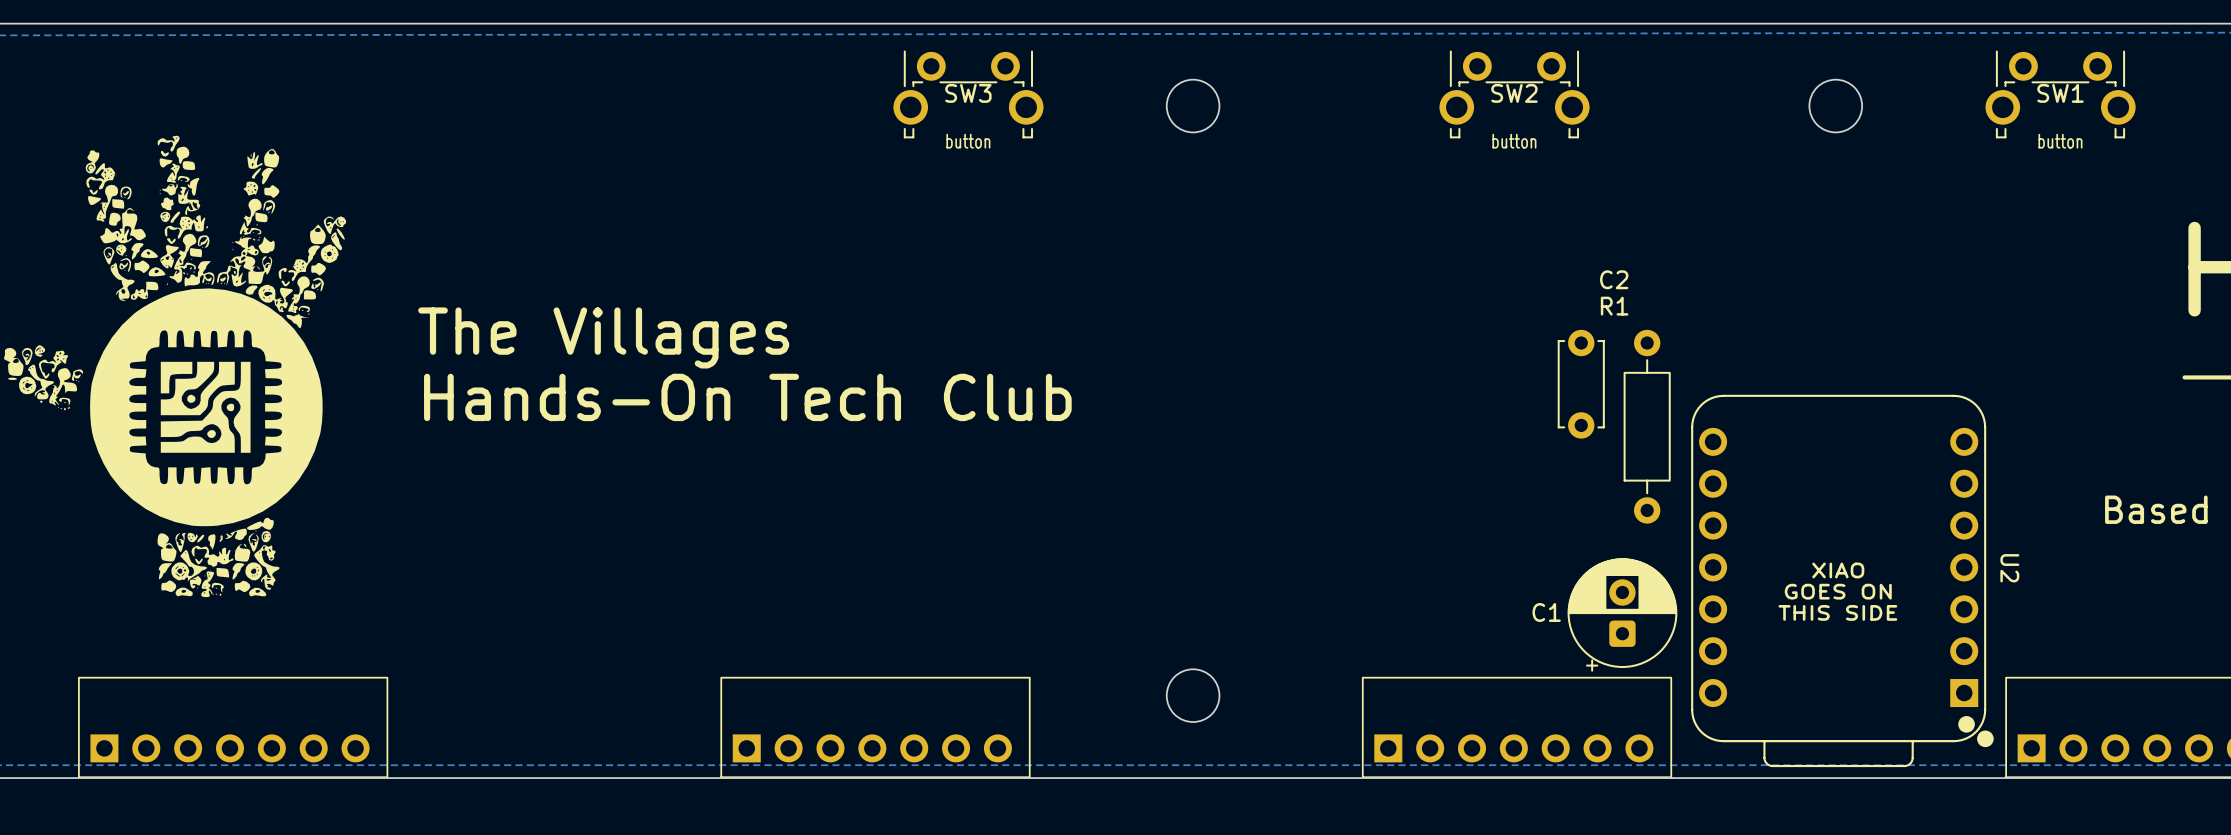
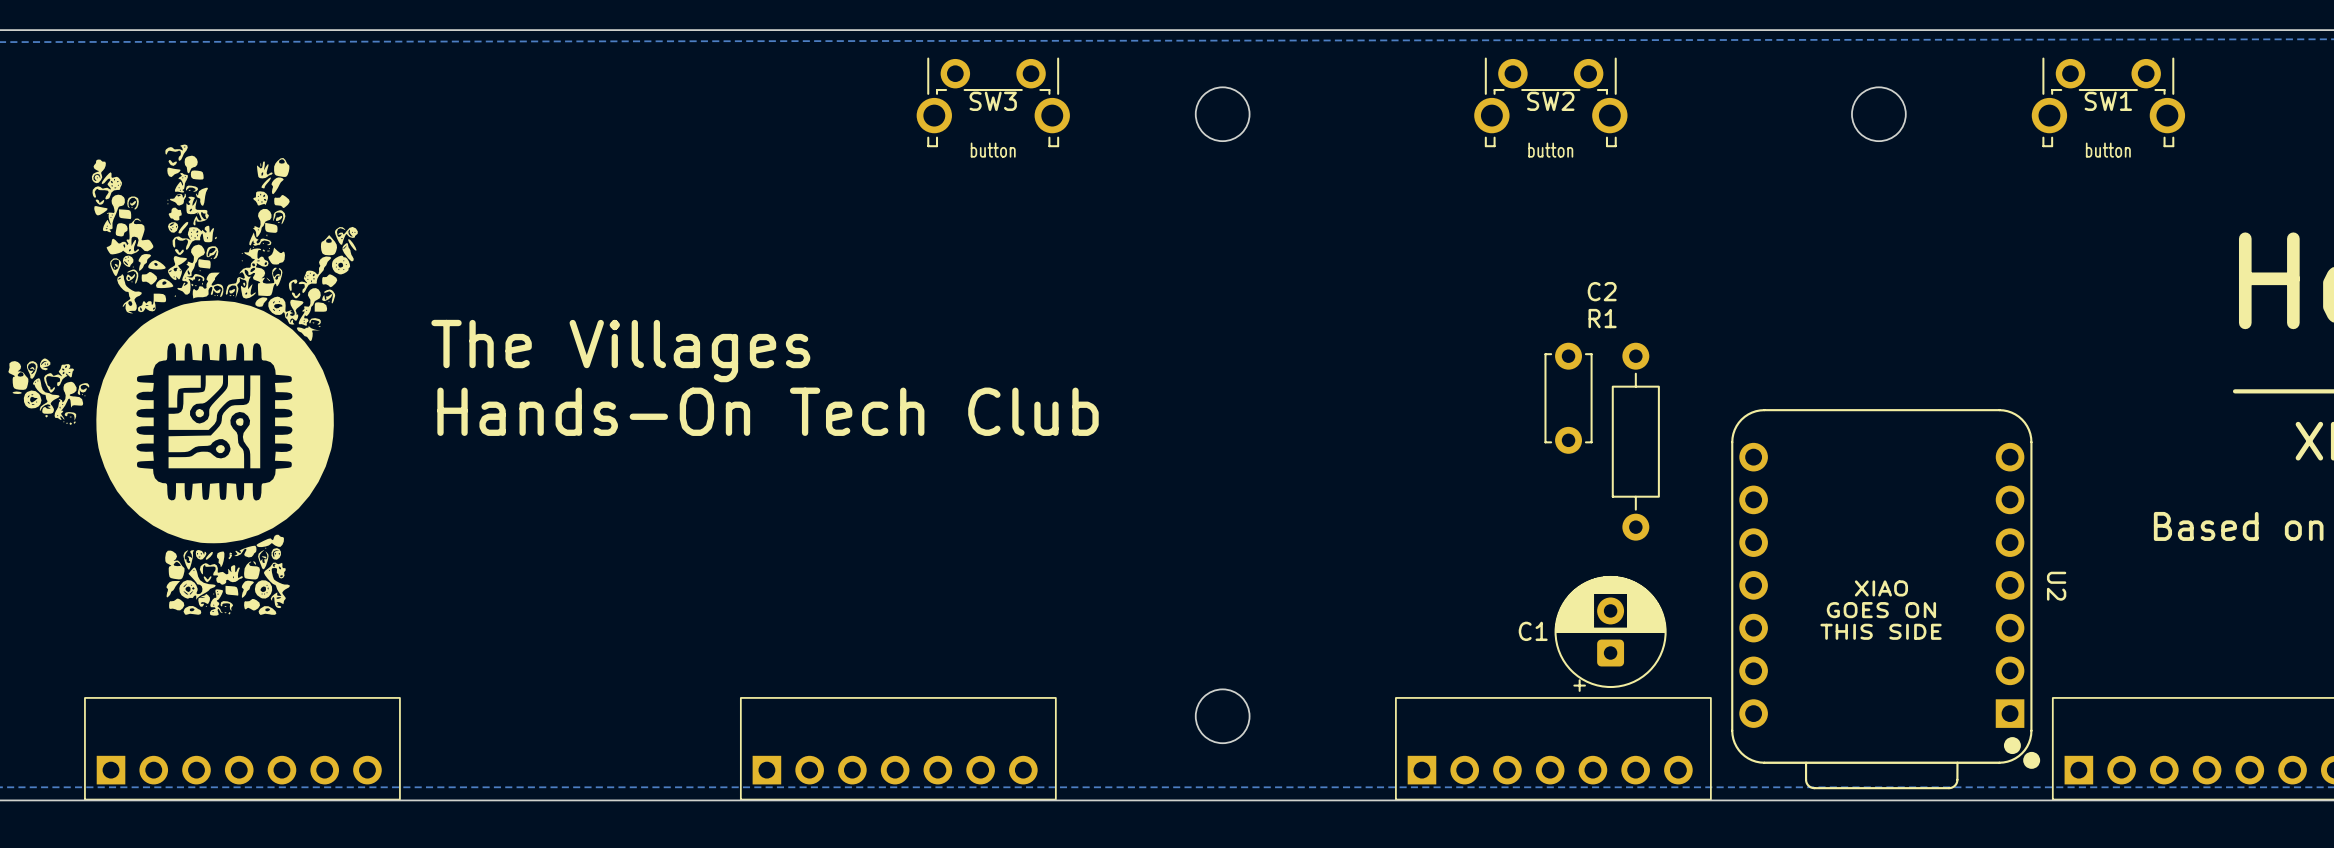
C2 position: (1581, 384) -> (1568, 398)
R1 position: (1647, 426) -> (1635, 441)
C1 position: (1622, 615) -> (1610, 633)

